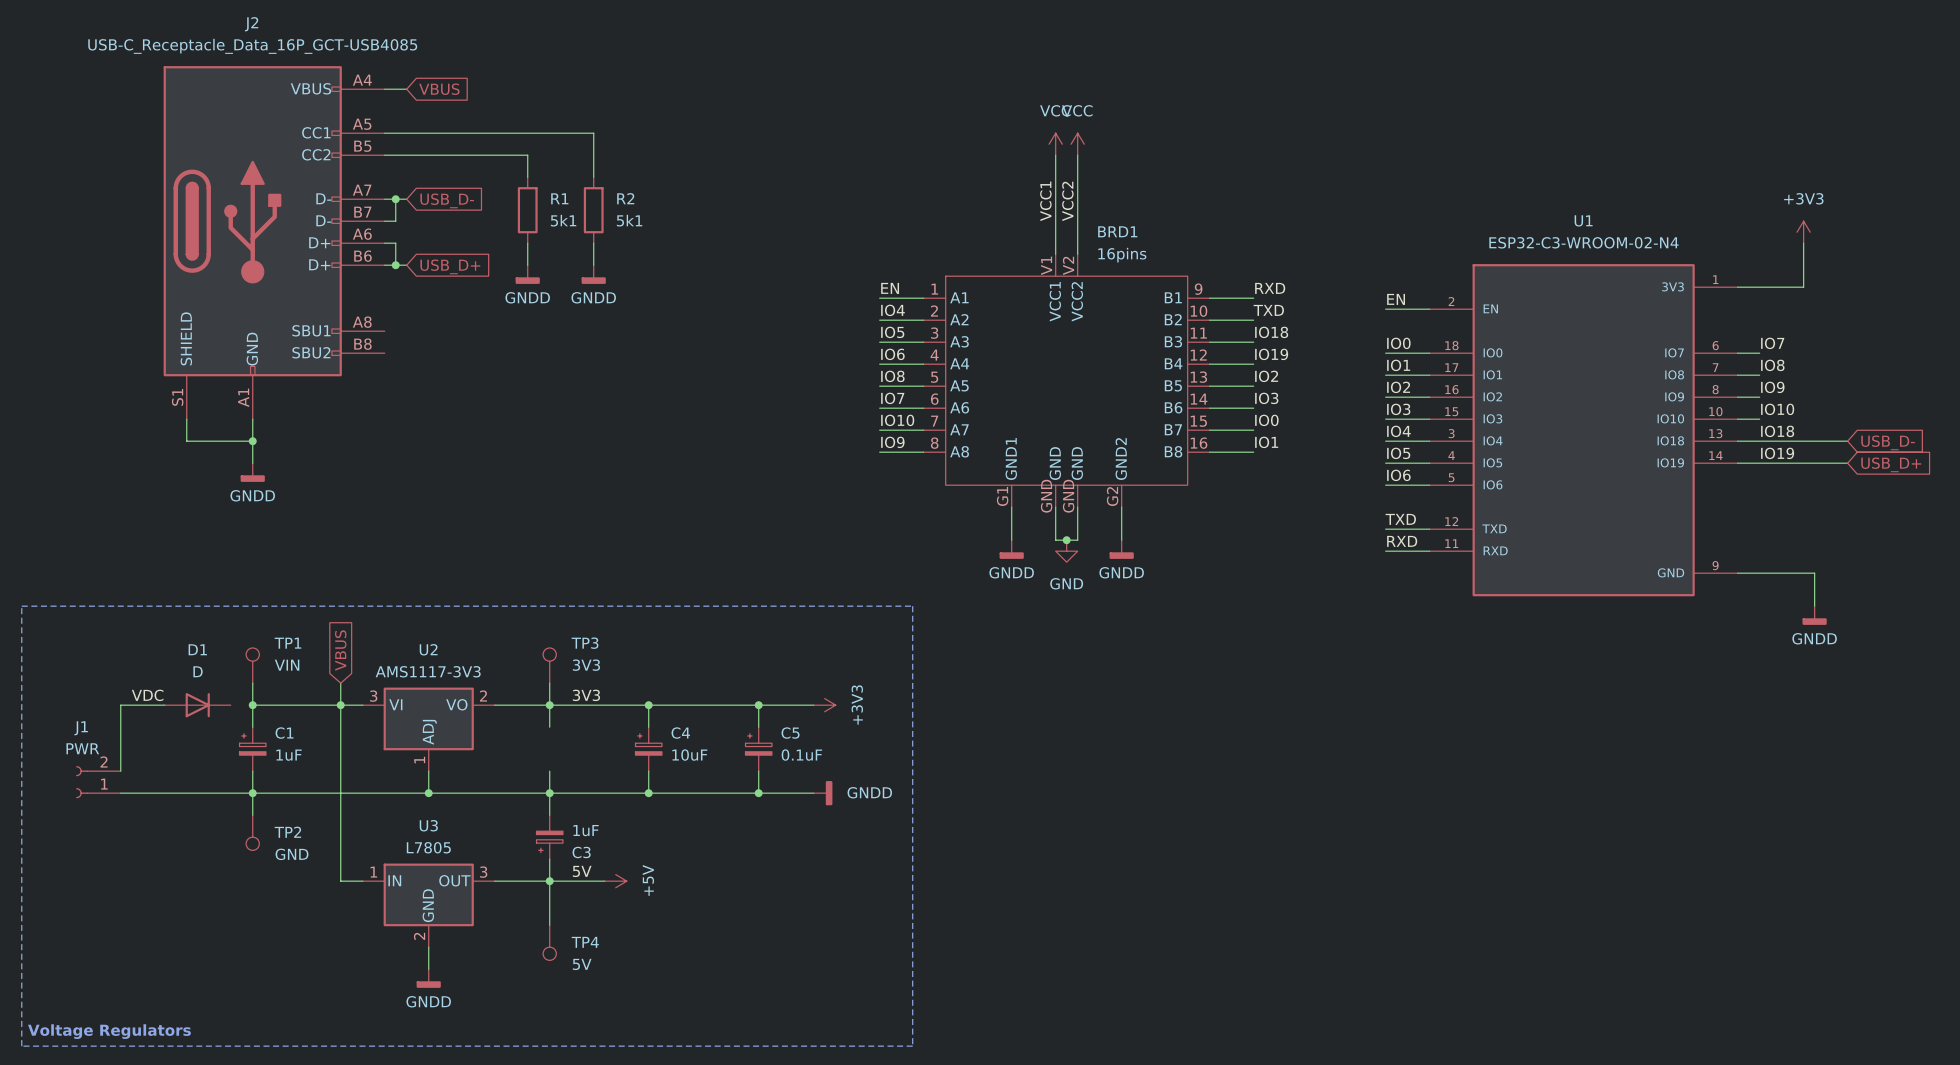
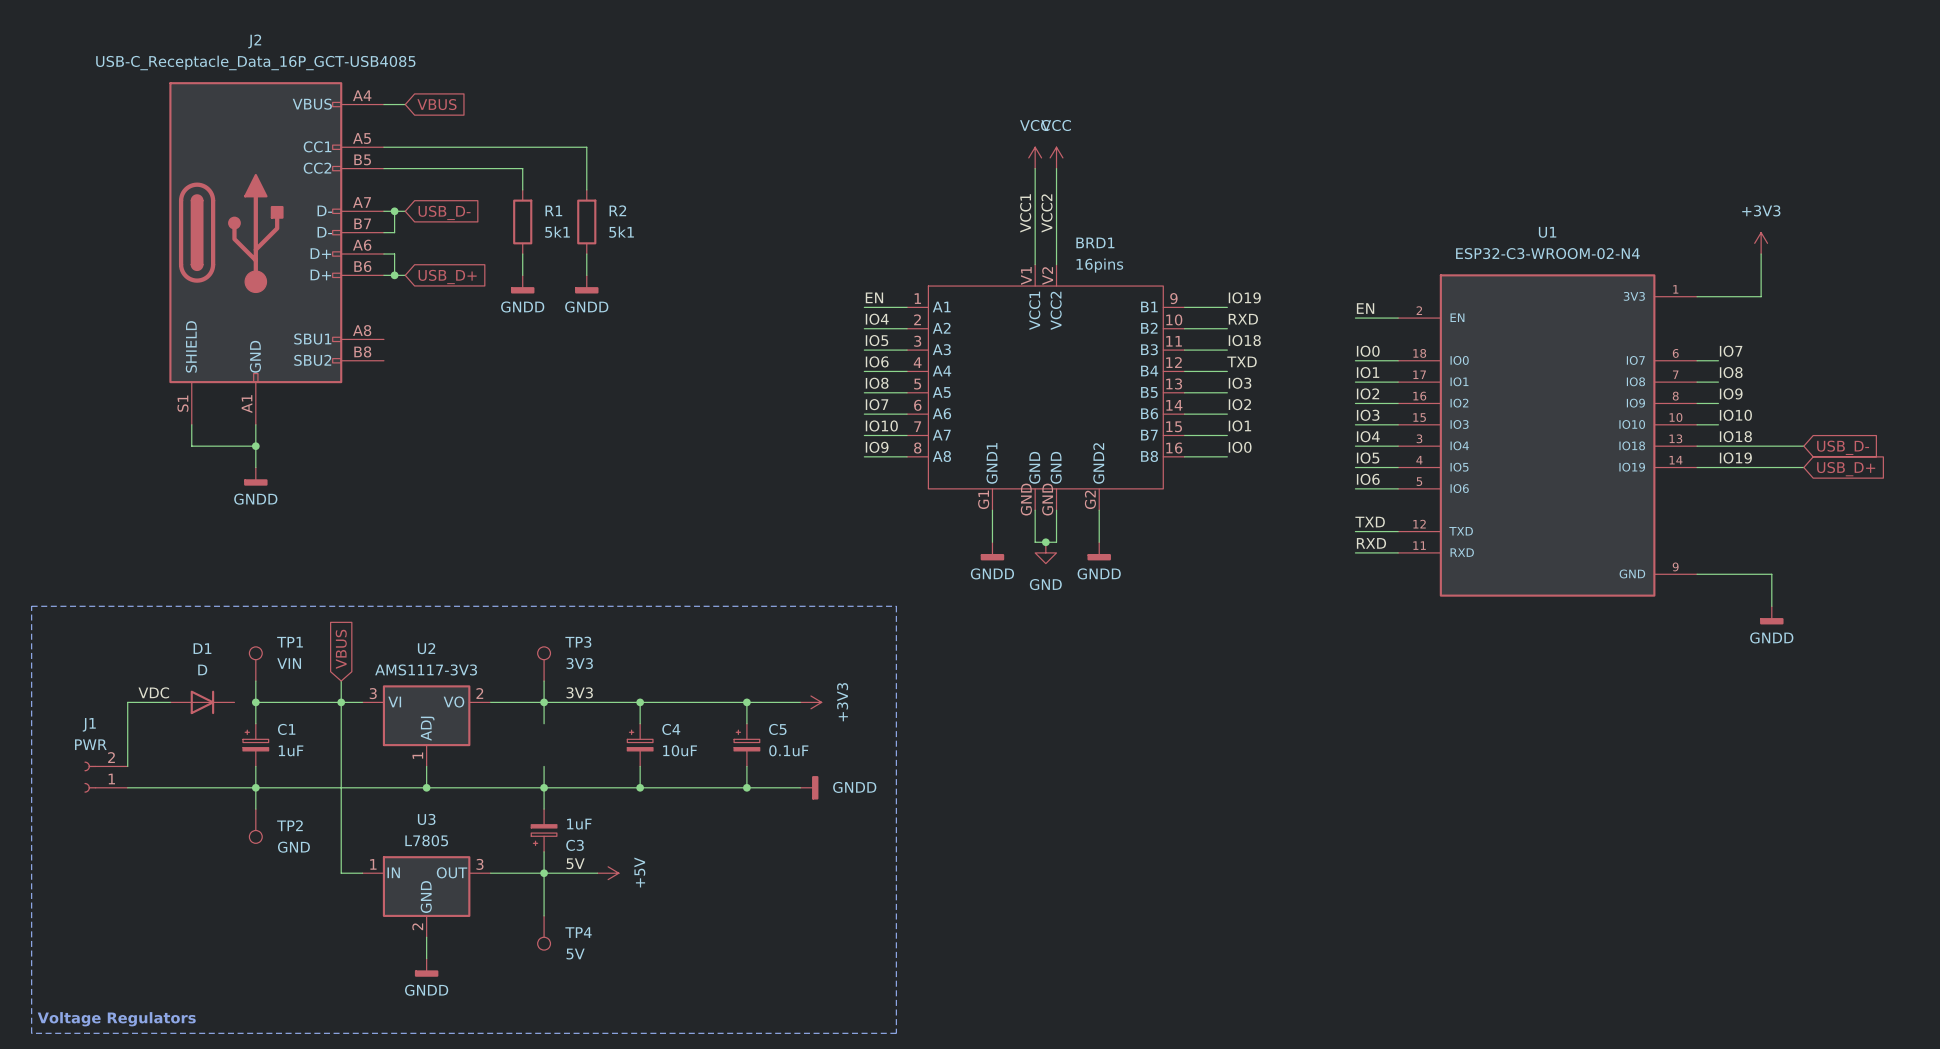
label: RXD (1270, 288) -> IO19 (1244, 297)
label: TXD (1268, 310) -> RXD (1243, 319)
label: IO19 (1271, 354) -> TXD (1242, 361)
label: IO2 (1266, 376) -> IO3 (1240, 383)
label: IO3 (1266, 398) -> IO2 (1239, 404)
label: IO0 (1266, 420) -> IO1 (1239, 425)
label: IO1 (1266, 442) -> IO0 (1240, 447)

